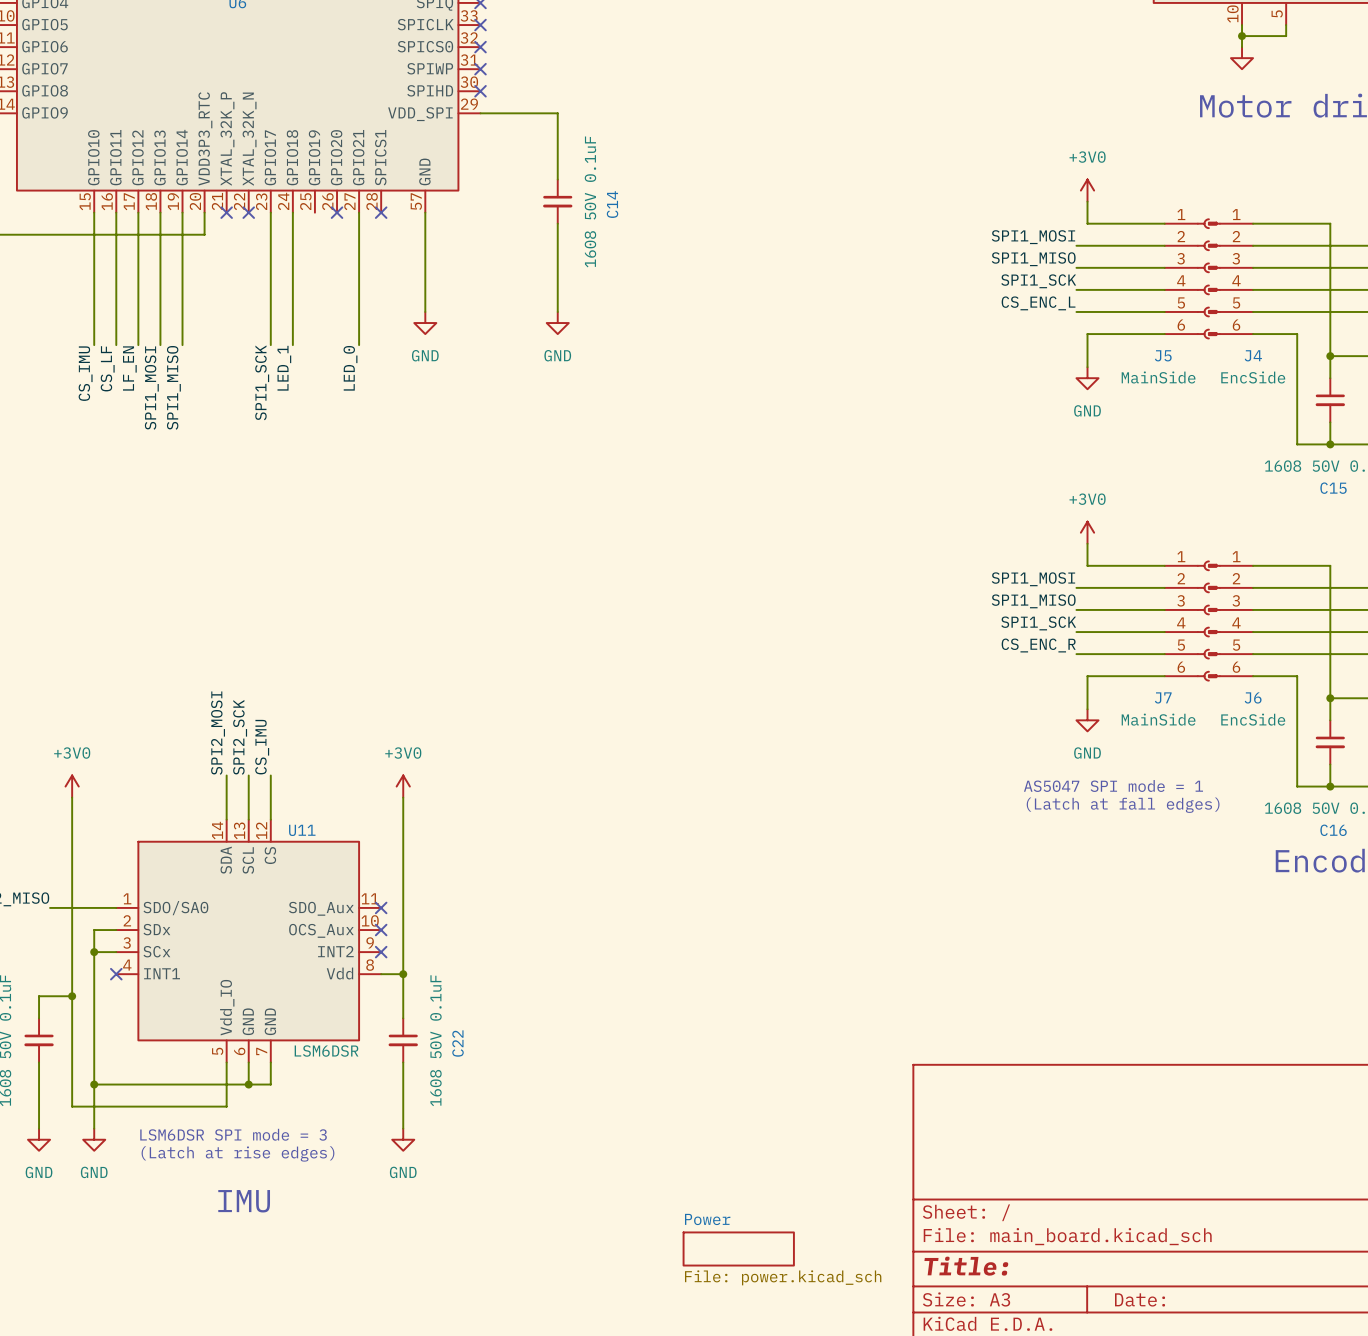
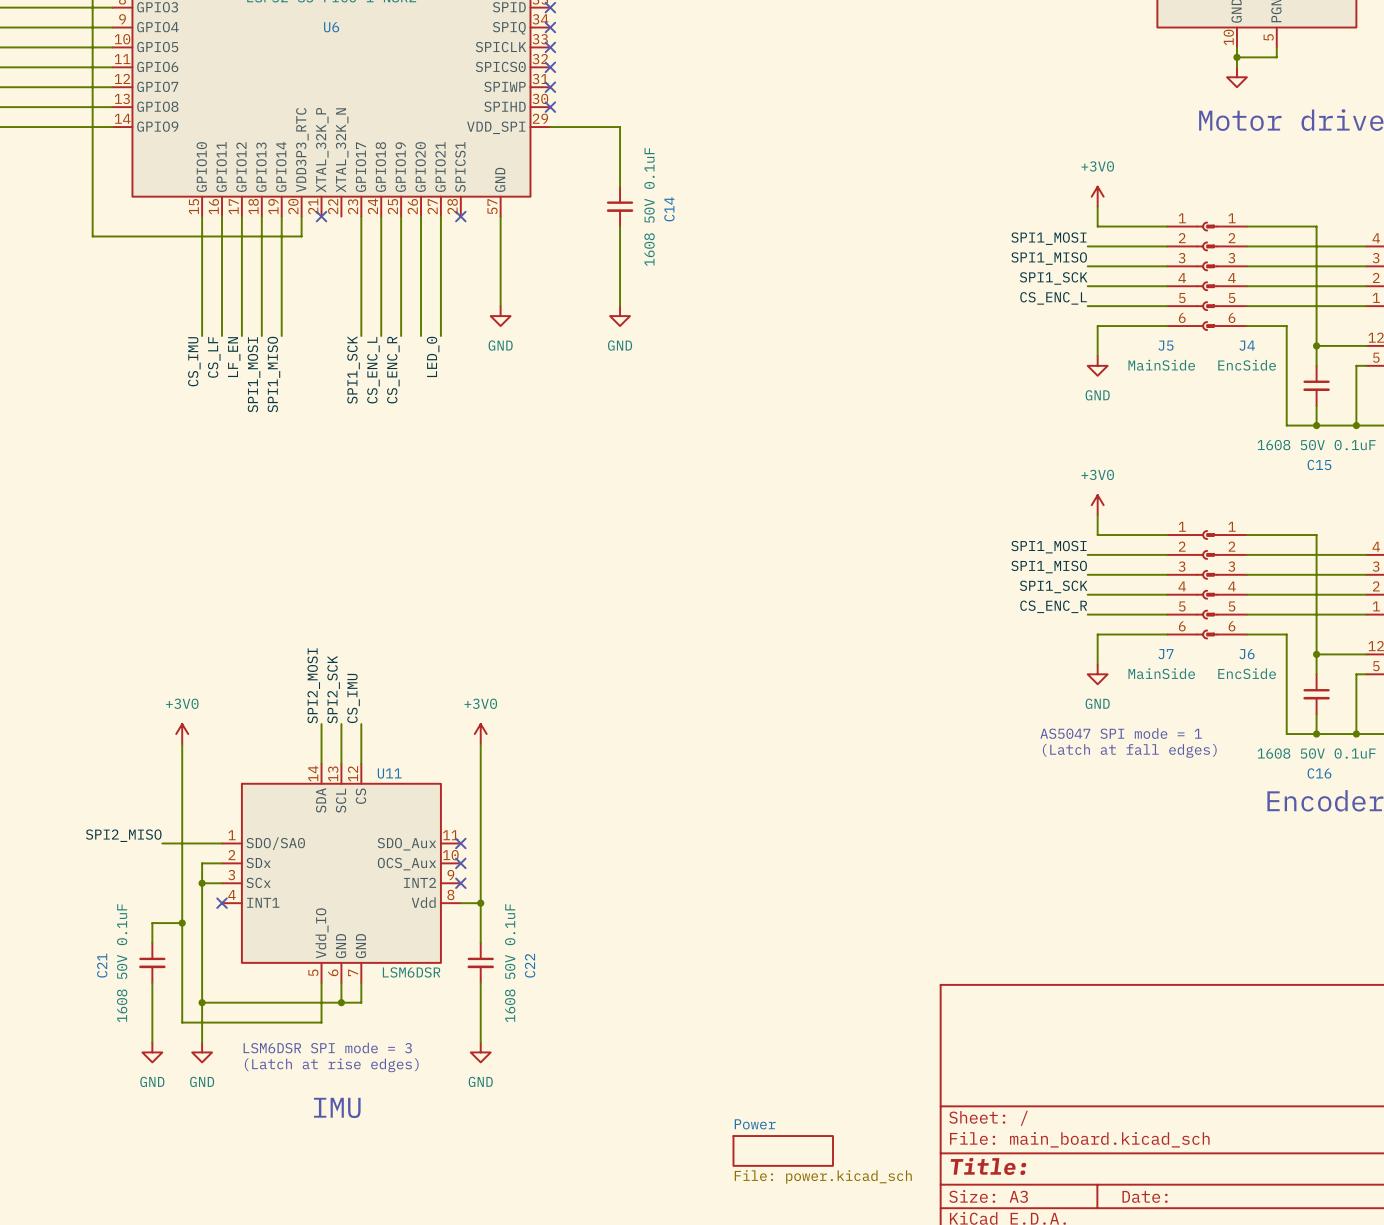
no-connect mark: (248, 212) -> none
wire: none -> (401, 216) (401, 335)
wire: none -> (421, 216) (421, 335)
no-connect mark: (337, 212) -> none
label: LED_1 (284, 368) -> CS_ENC_L (373, 370)
label: none -> CS_ENC_R (393, 370)

